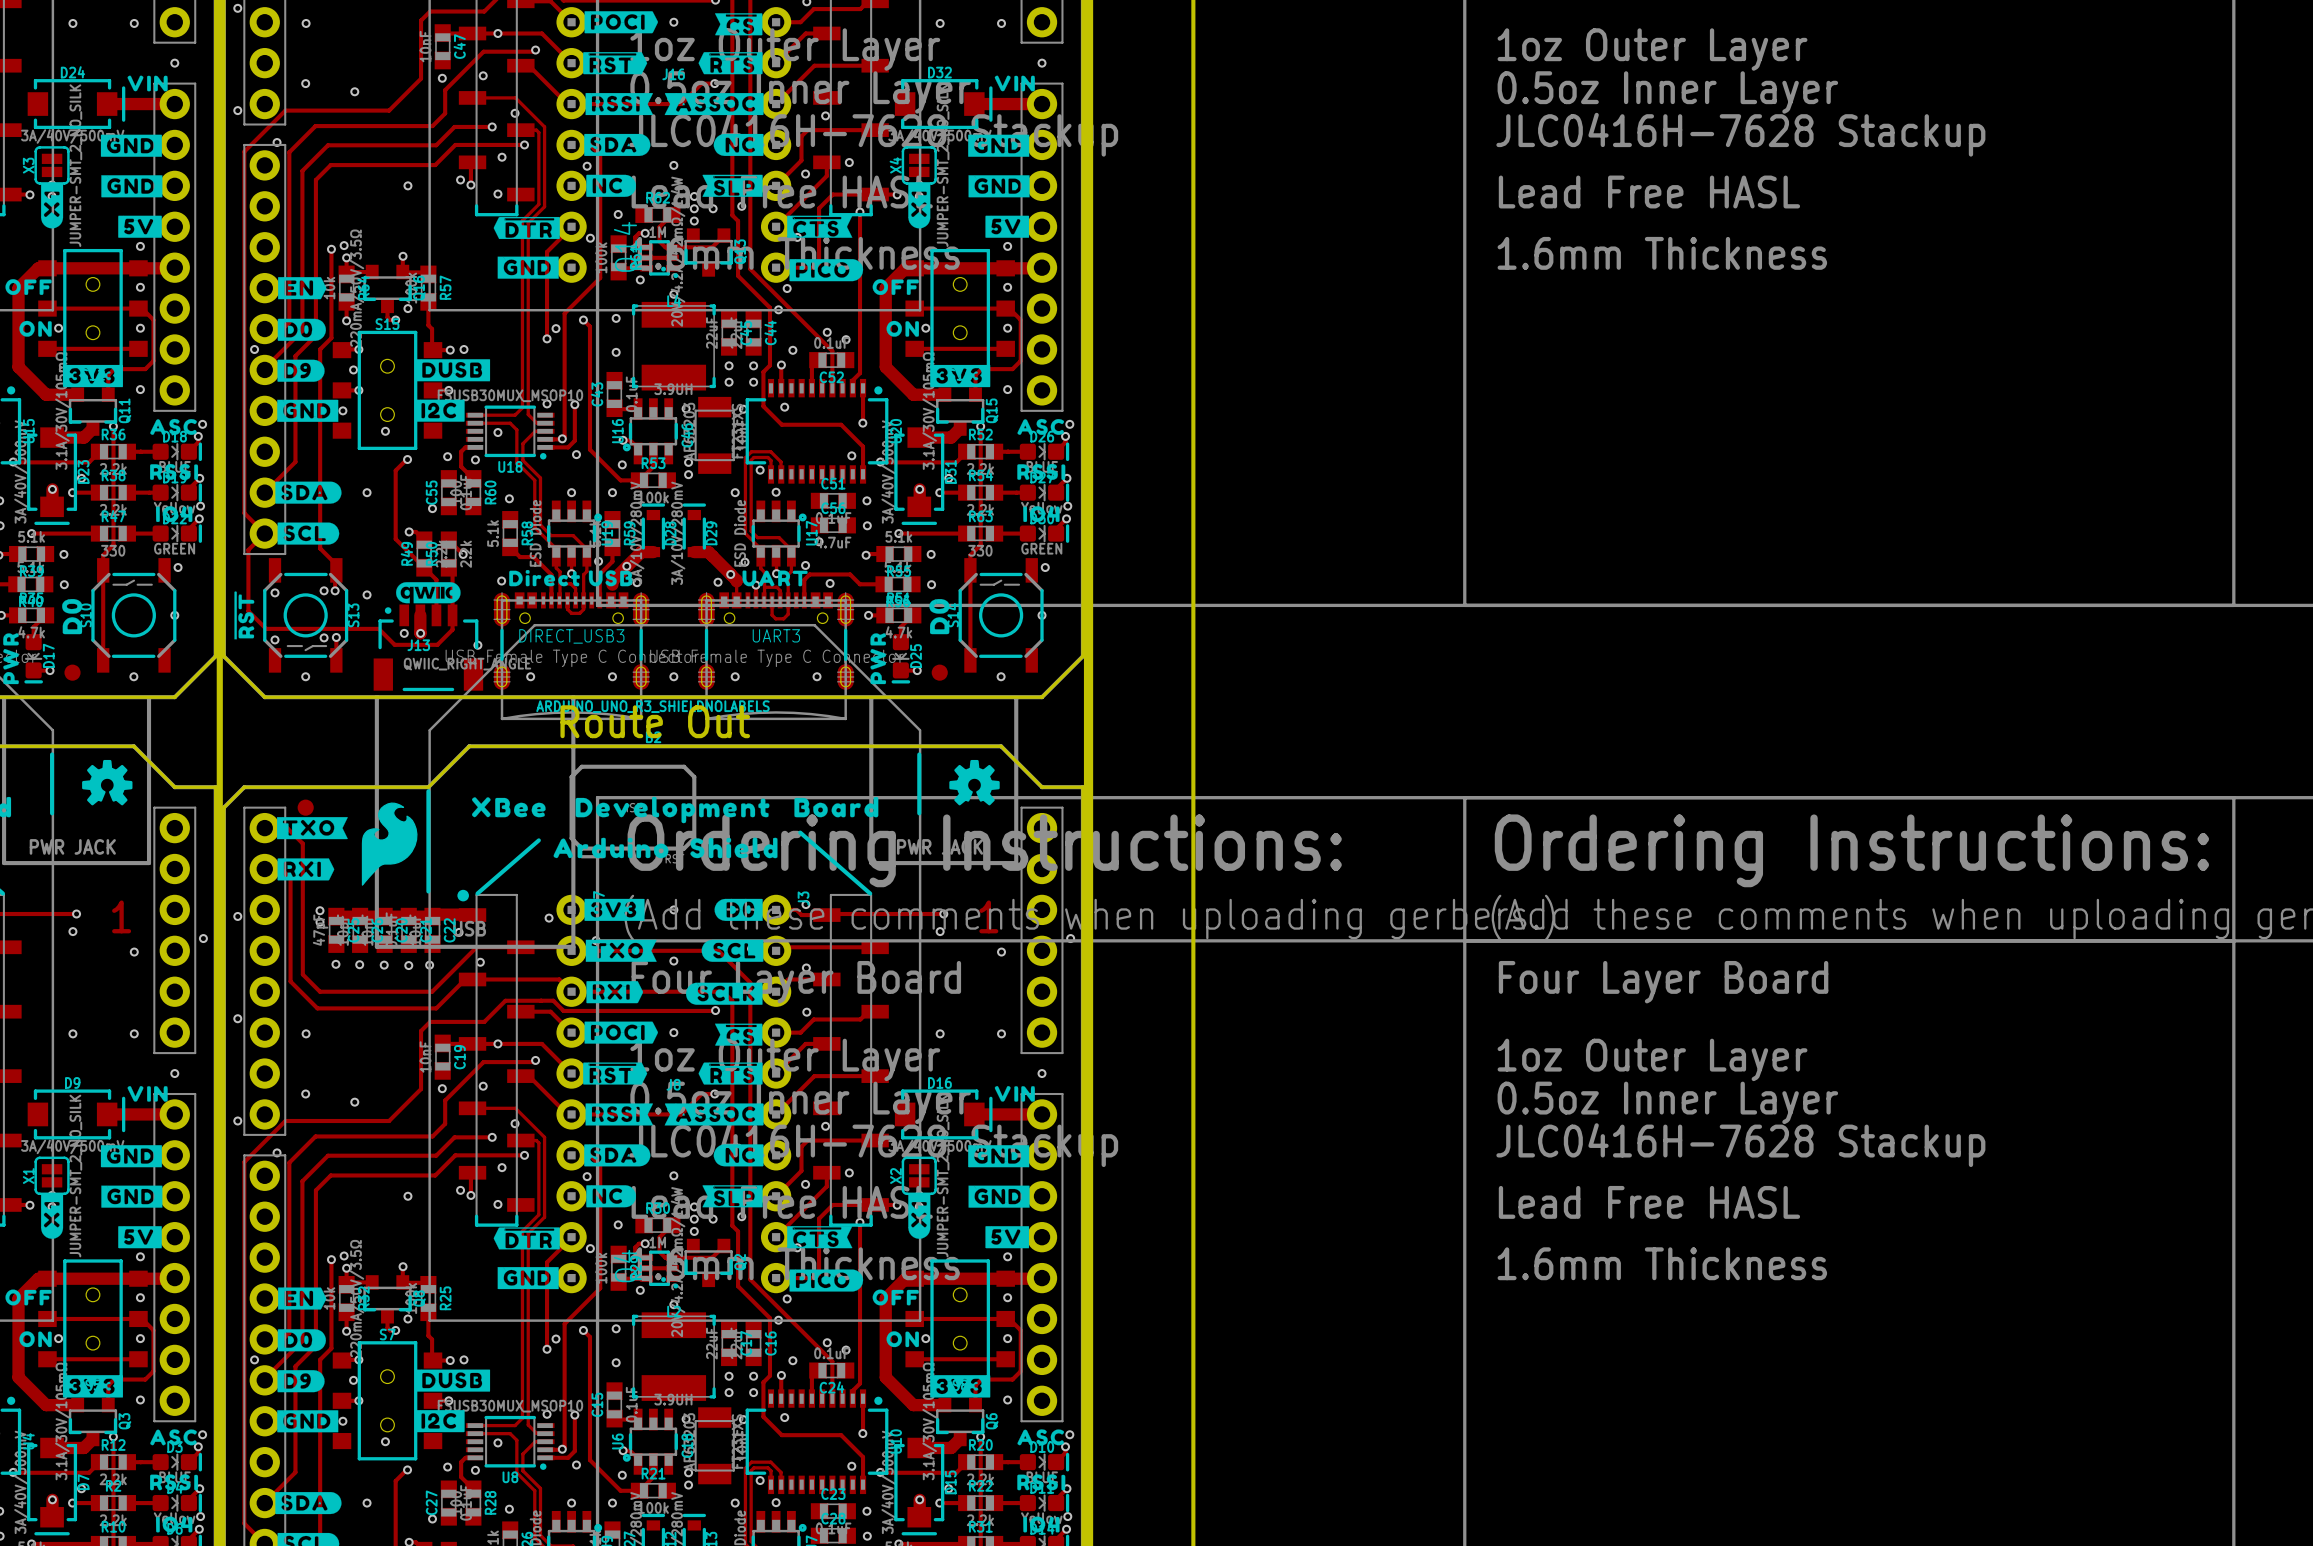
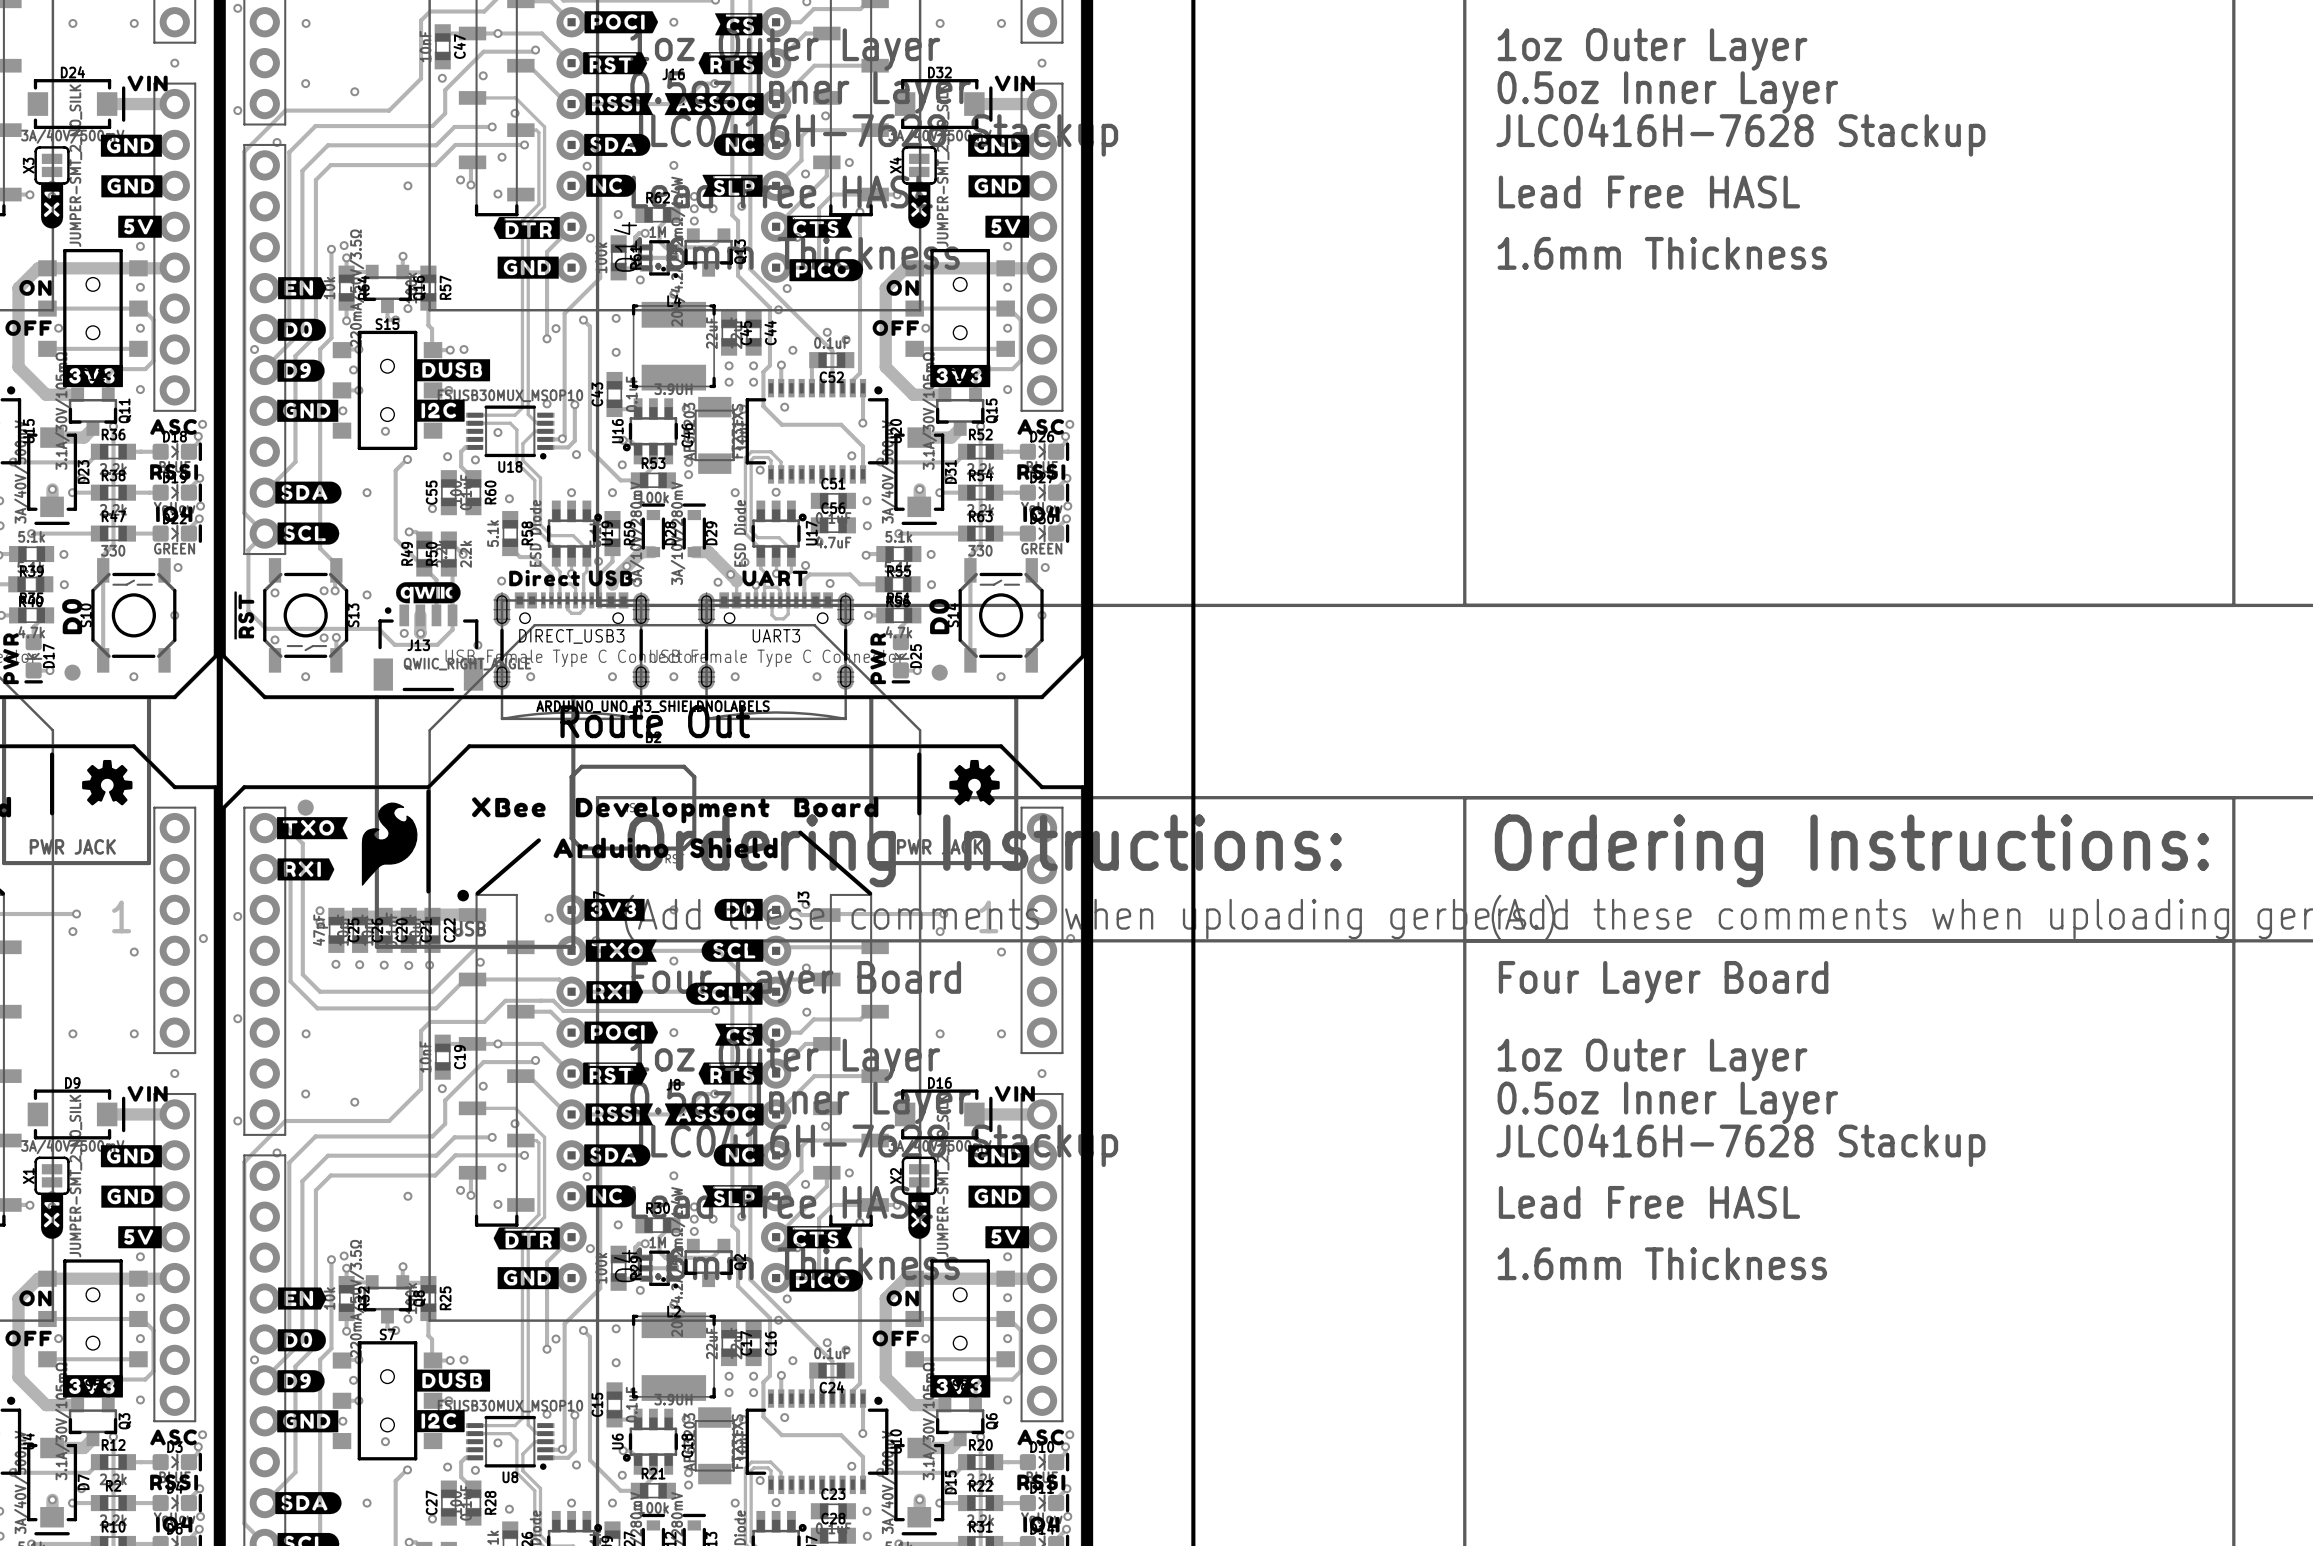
drawing position: (28, 287) -> (28, 327)
drawing position: (895, 287) -> (895, 327)
drawing position: (35, 328) -> (35, 287)
drawing position: (902, 328) -> (902, 287)
drawing position: (28, 1297) -> (28, 1338)
drawing position: (895, 1297) -> (895, 1338)
drawing position: (35, 1339) -> (35, 1298)
drawing position: (902, 1339) -> (902, 1298)

